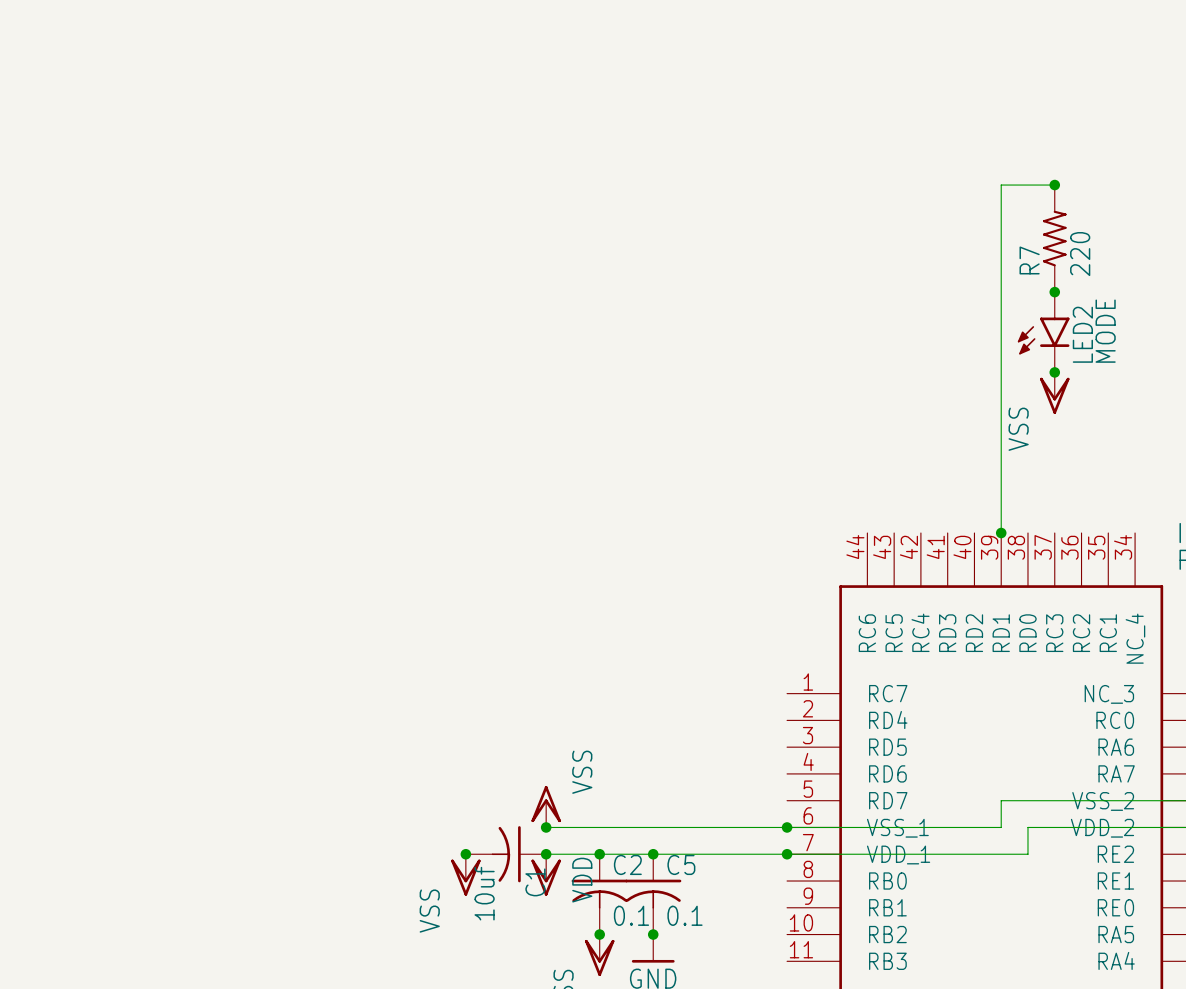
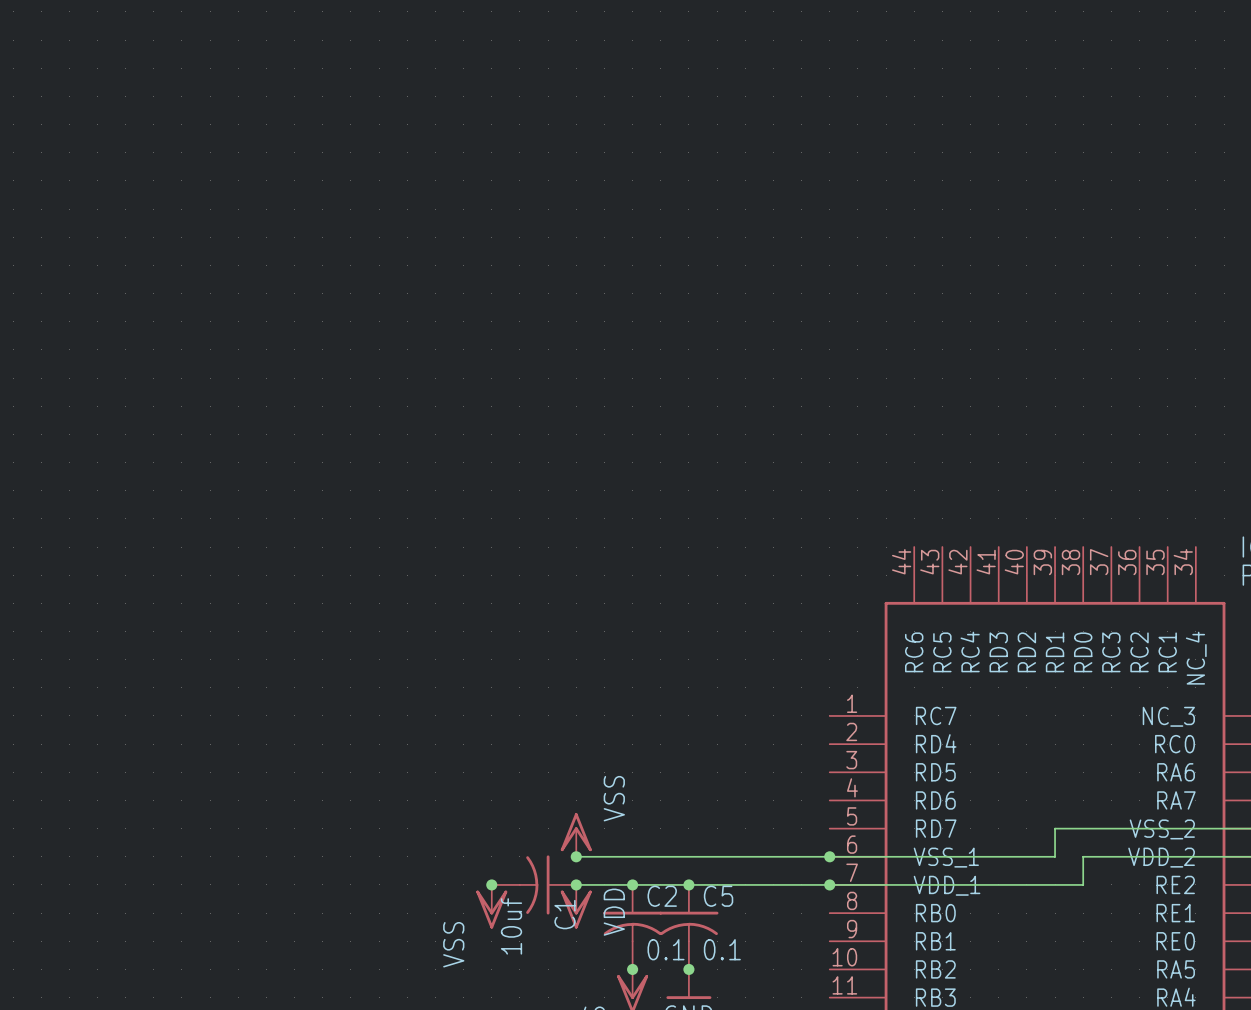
wire: (1054, 185) (1001, 185) (1001, 533) -> none
junction: (1054, 185) -> none
R7: 220 (1054, 238) -> none
junction: (1054, 292) -> none
LED2: MODE (1043, 332) -> none
junction: (1054, 372) -> none
power symbol: VSS (1054, 393) -> none
junction: (1001, 533) -> none

